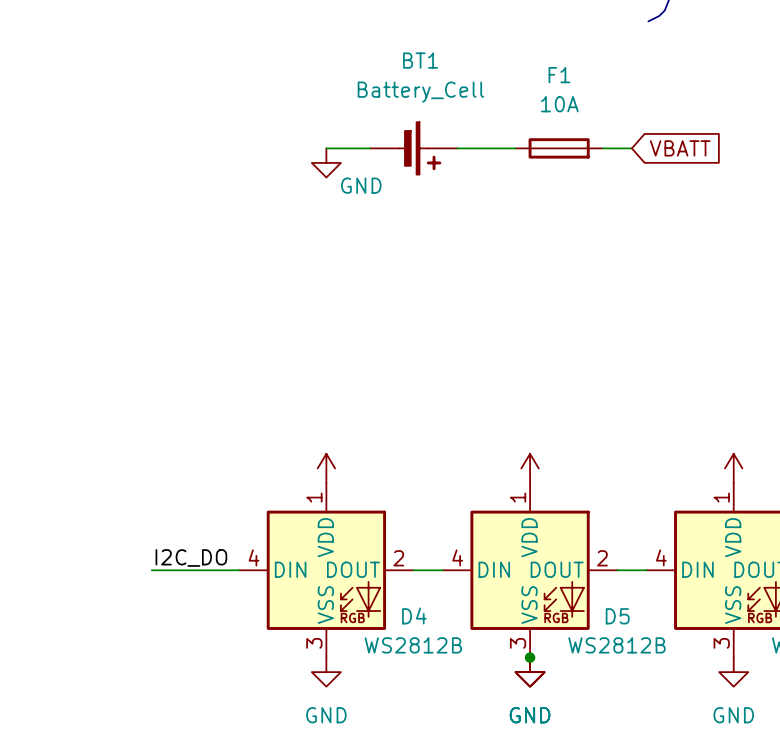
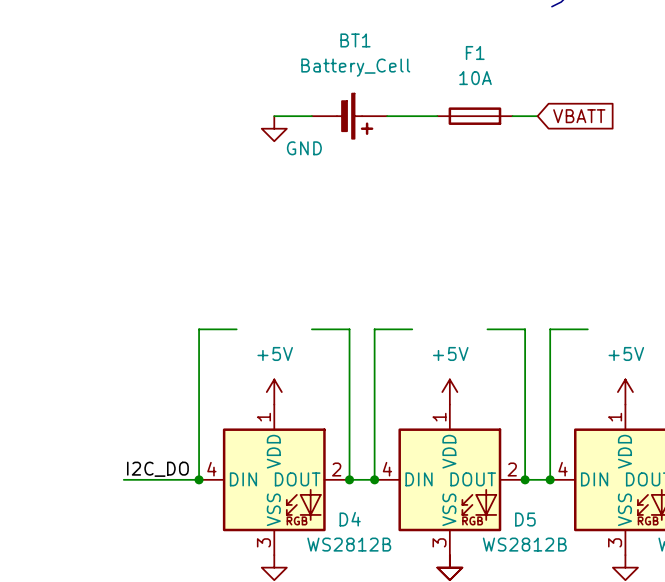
wire: none -> (236, 329) (199, 329) (199, 479)
wire: none -> (311, 329) (349, 329) (349, 479)
wire: none -> (412, 329) (374, 329) (374, 479)
wire: none -> (487, 329) (525, 329) (525, 479)
wire: none -> (587, 329) (550, 329) (550, 479)
power symbol text: none -> +5V (275, 353)
power symbol text: none -> +5V (450, 353)
power symbol text: none -> +5V (626, 353)
junction: none -> (199, 479)
junction: none -> (349, 479)
junction: none -> (374, 479)
junction: none -> (525, 479)
junction: none -> (550, 479)
junction: (530, 657) -> none

